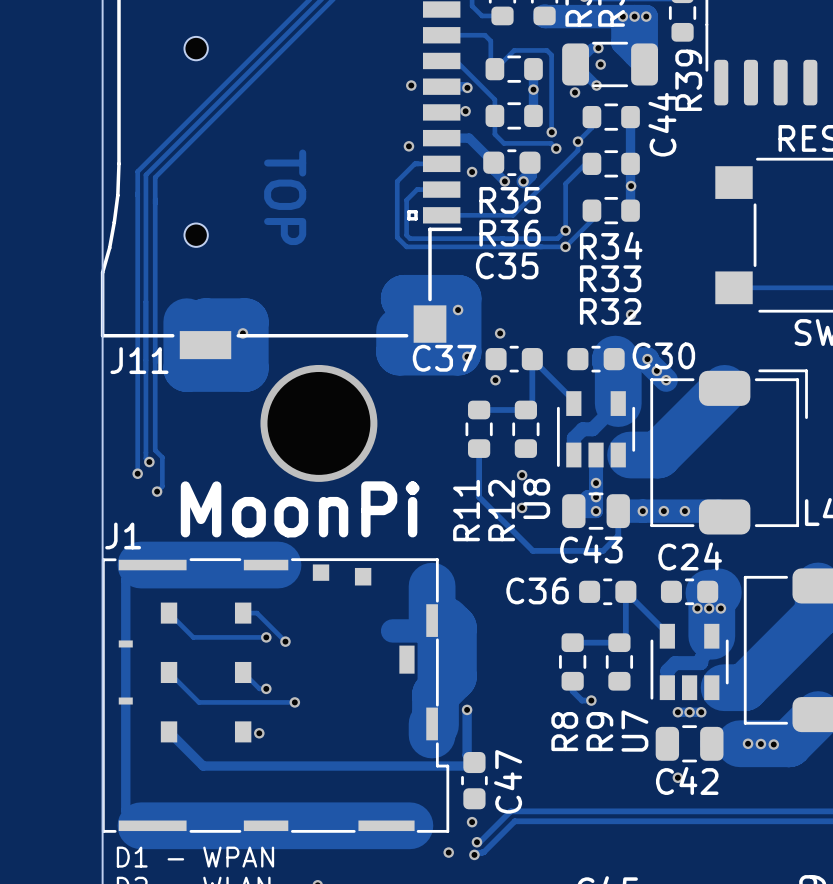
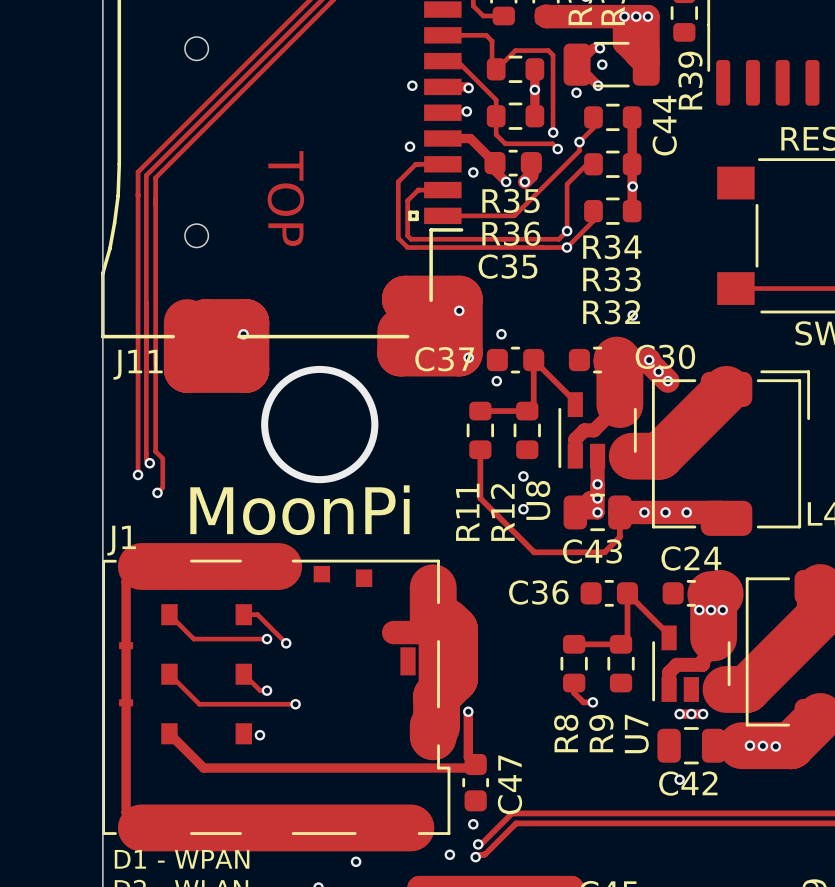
via: none -> (356, 861)

